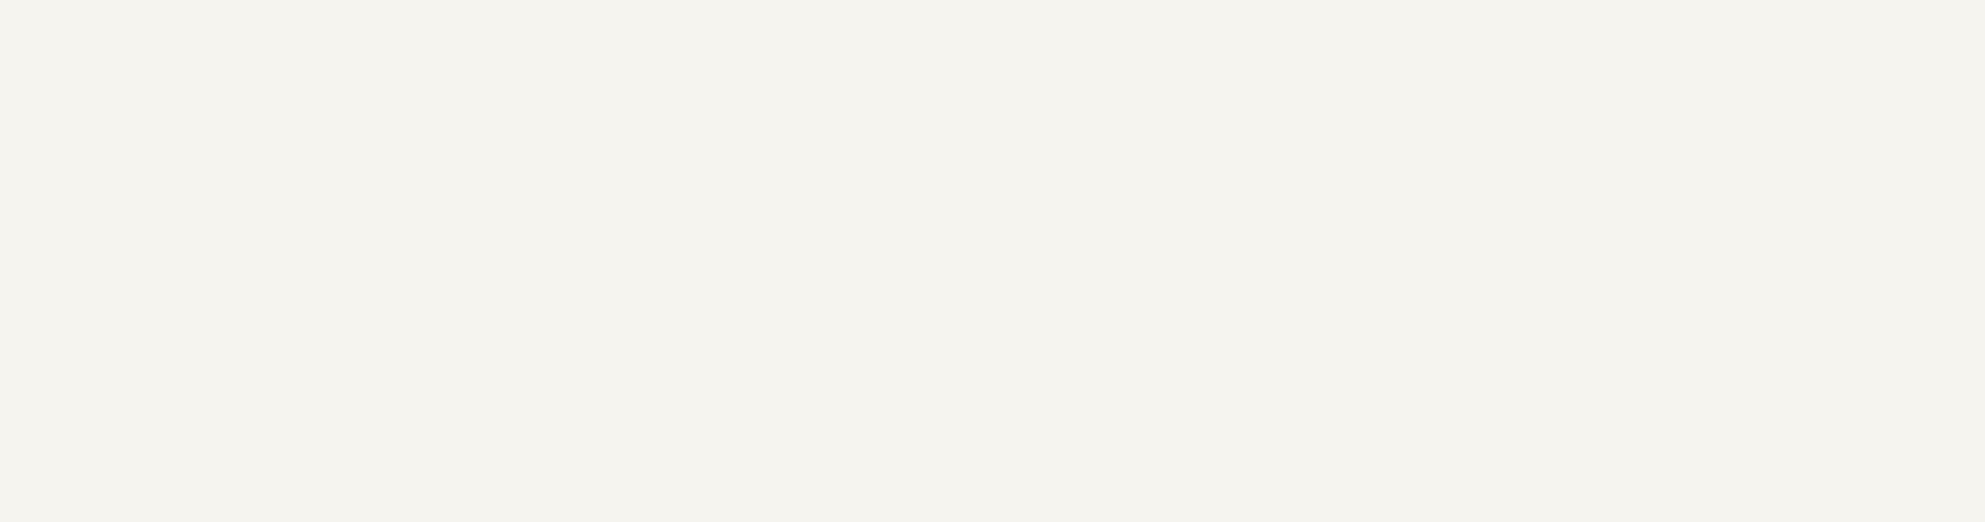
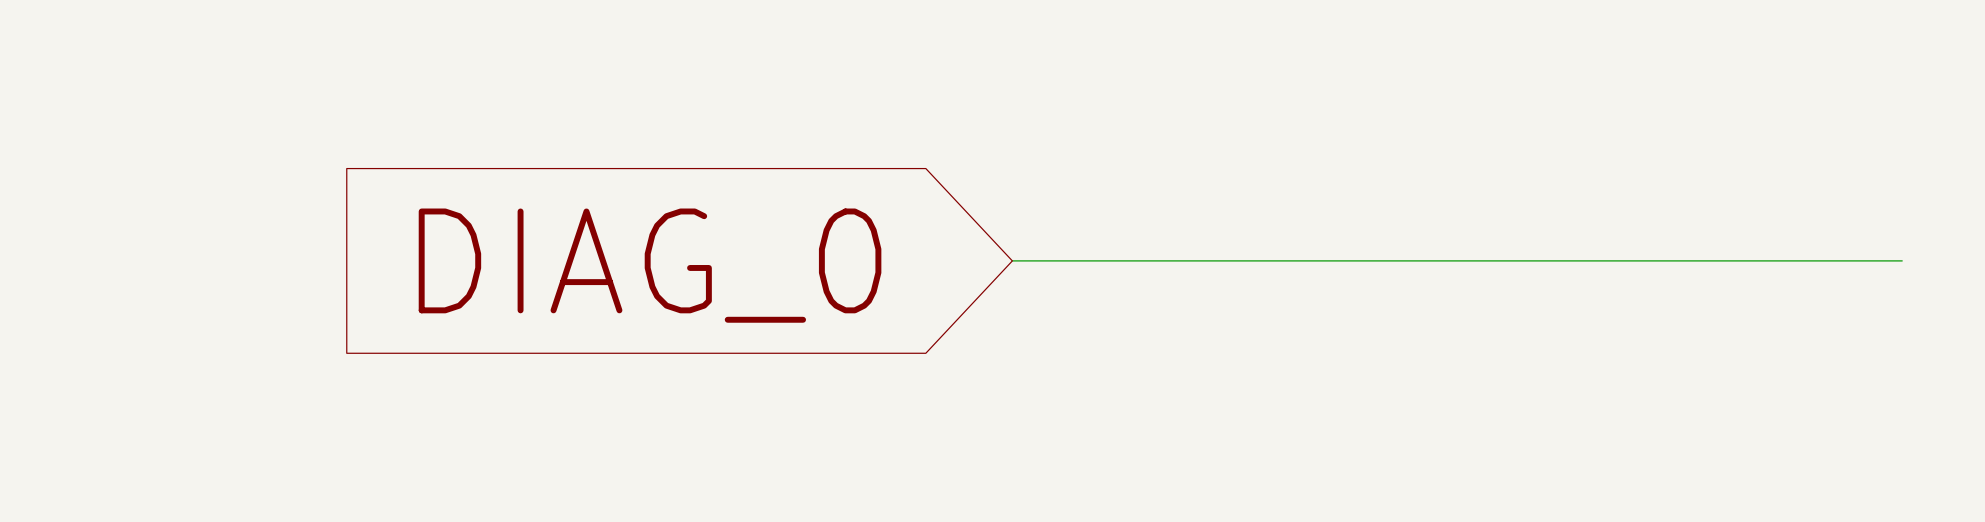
global label: none -> DIAG_0 (650, 265)
wire: none -> (1012, 260) (1902, 260)

